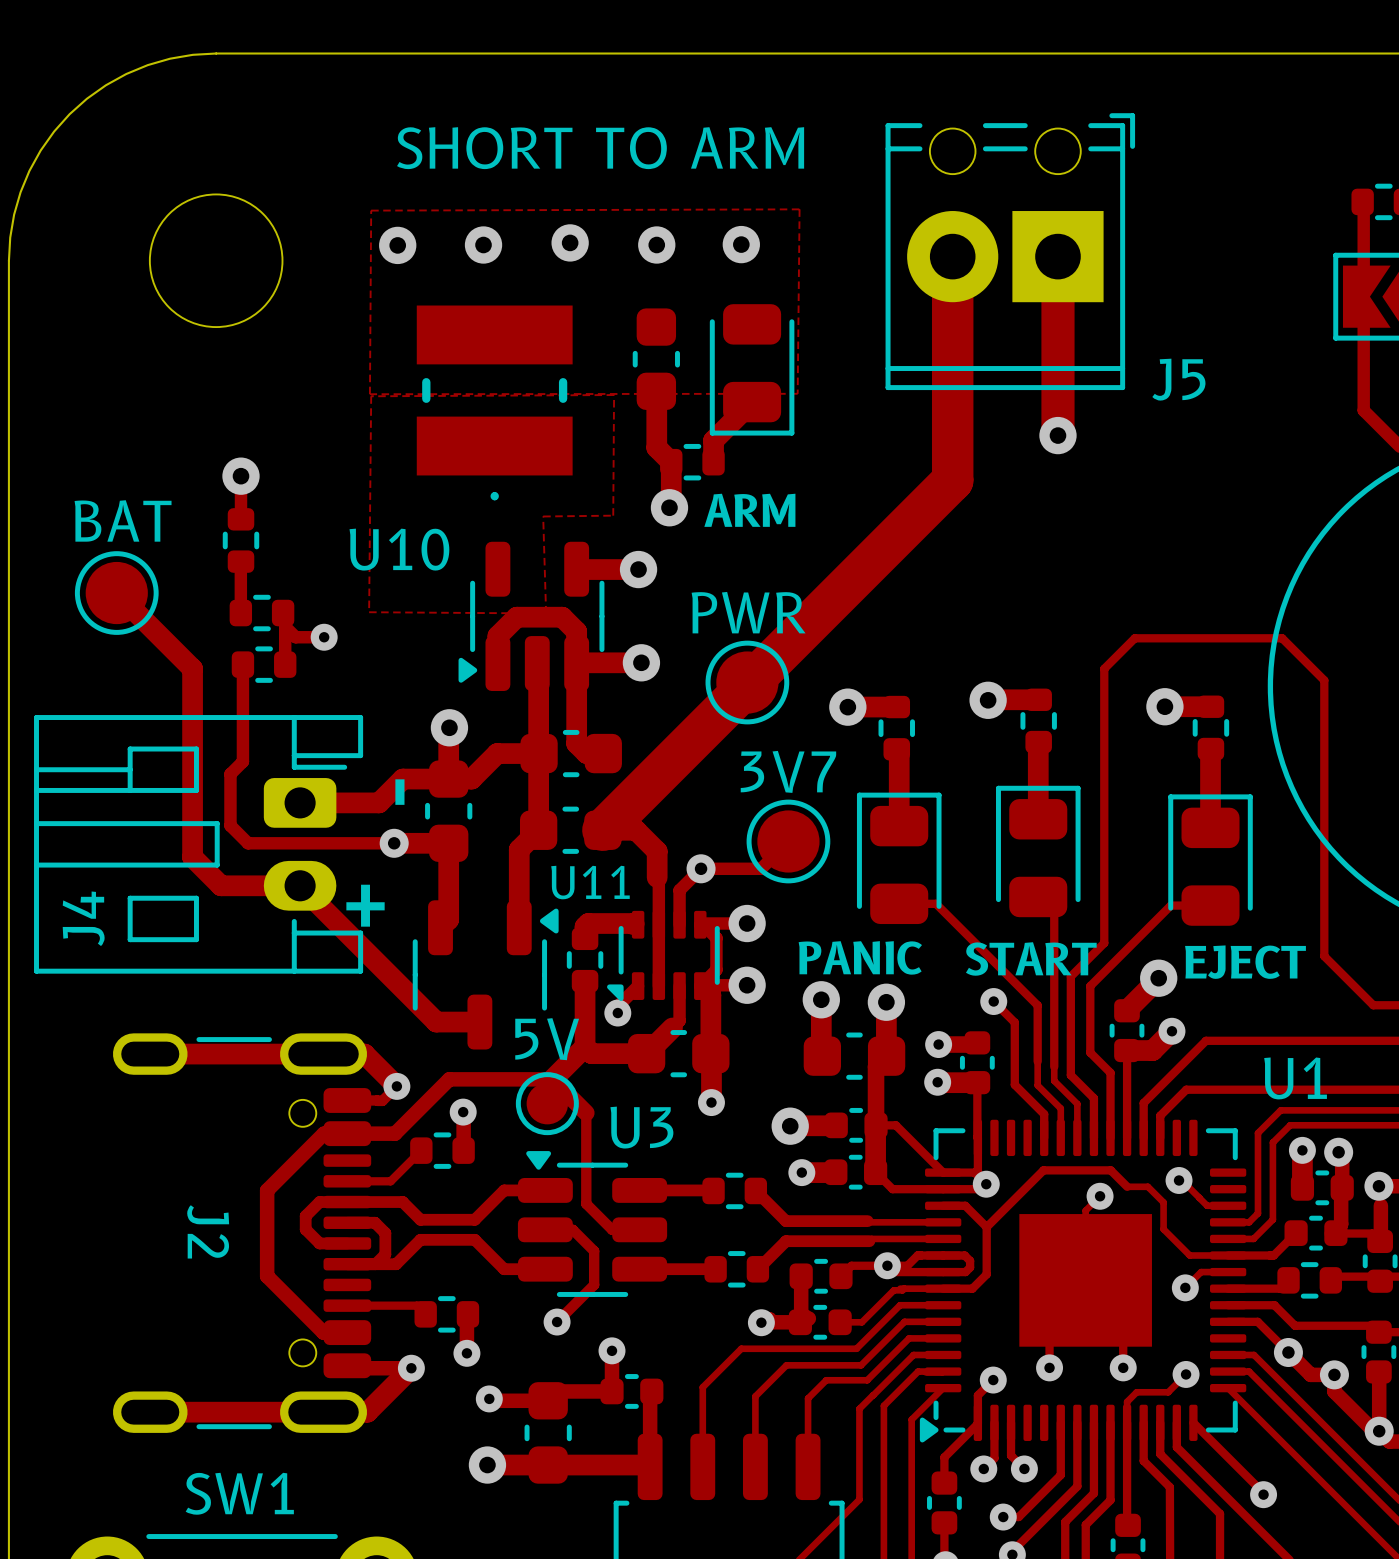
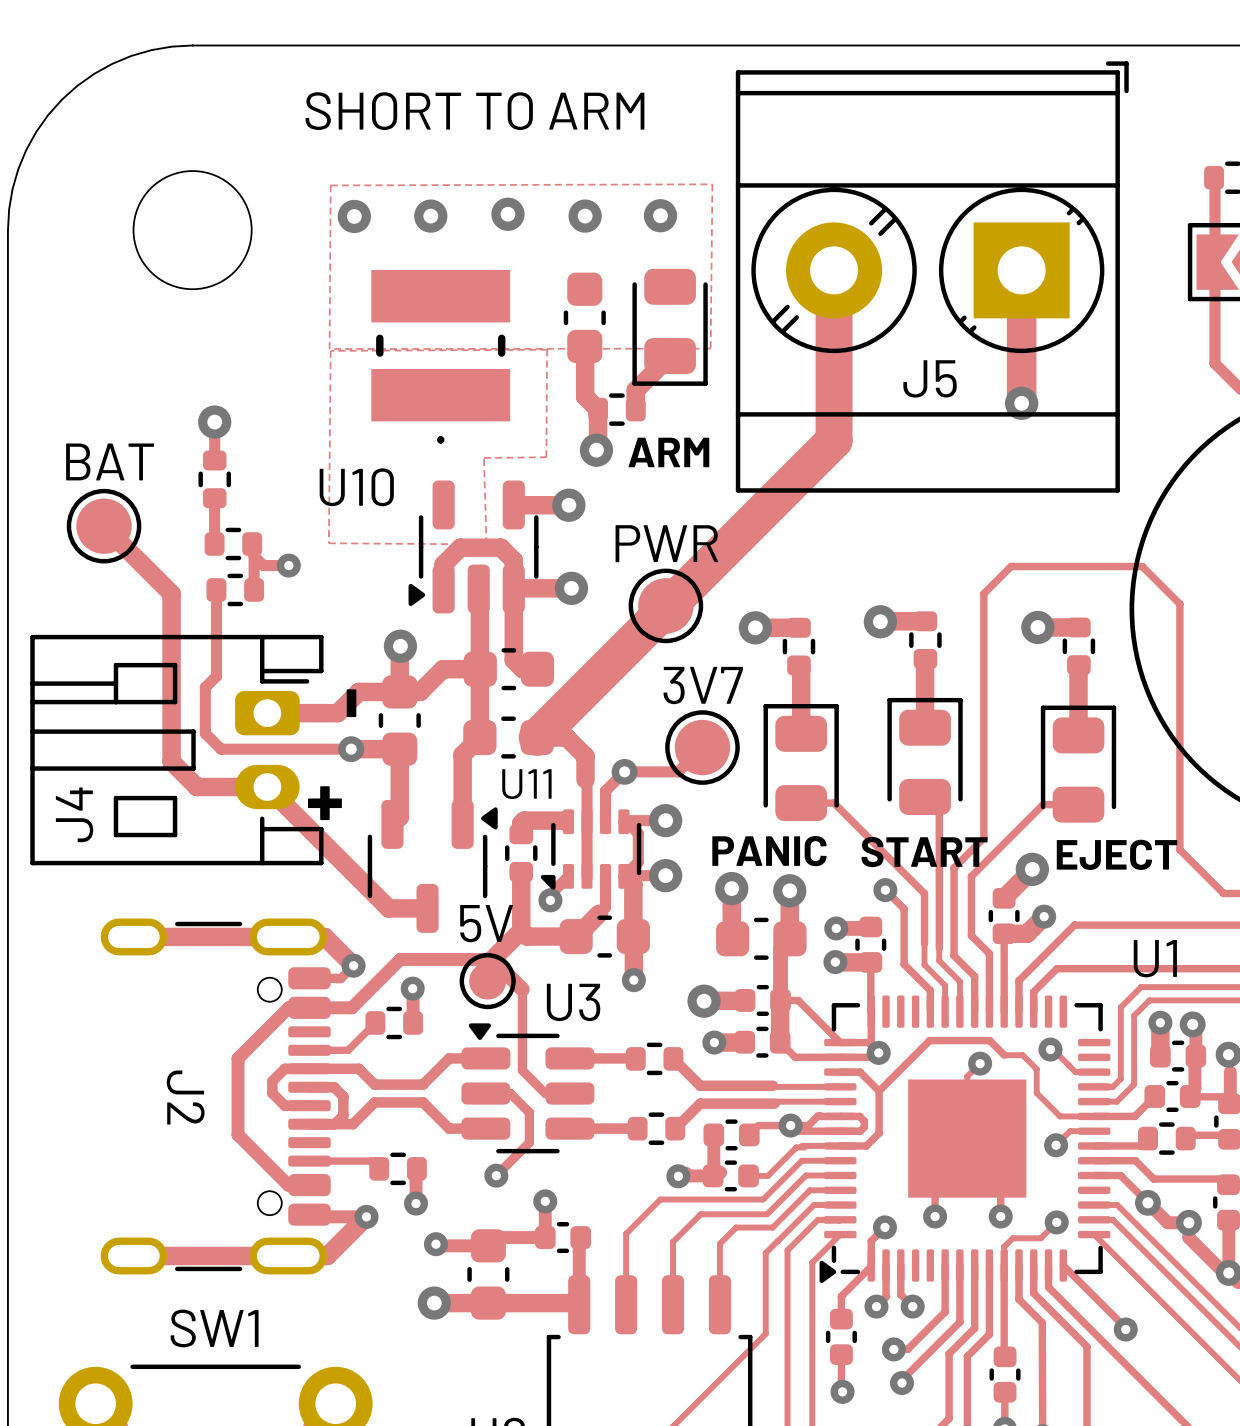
J5 footprint: [885, 113, 1136, 391] -> [735, 61, 1129, 493]
text position: SHORT TO ARM (600, 148) -> SHORT TO ARM (475, 111)
track: (952, 256) (952, 480) (936, 497) -> (834, 270) (834, 440)
track: (1057, 256) (1057, 435) -> none
track: none -> (1021, 270) (1021, 403)
J5 name position: J5 (1178, 379) -> J5 (930, 378)
via position: (1057, 435) -> (1021, 403)

